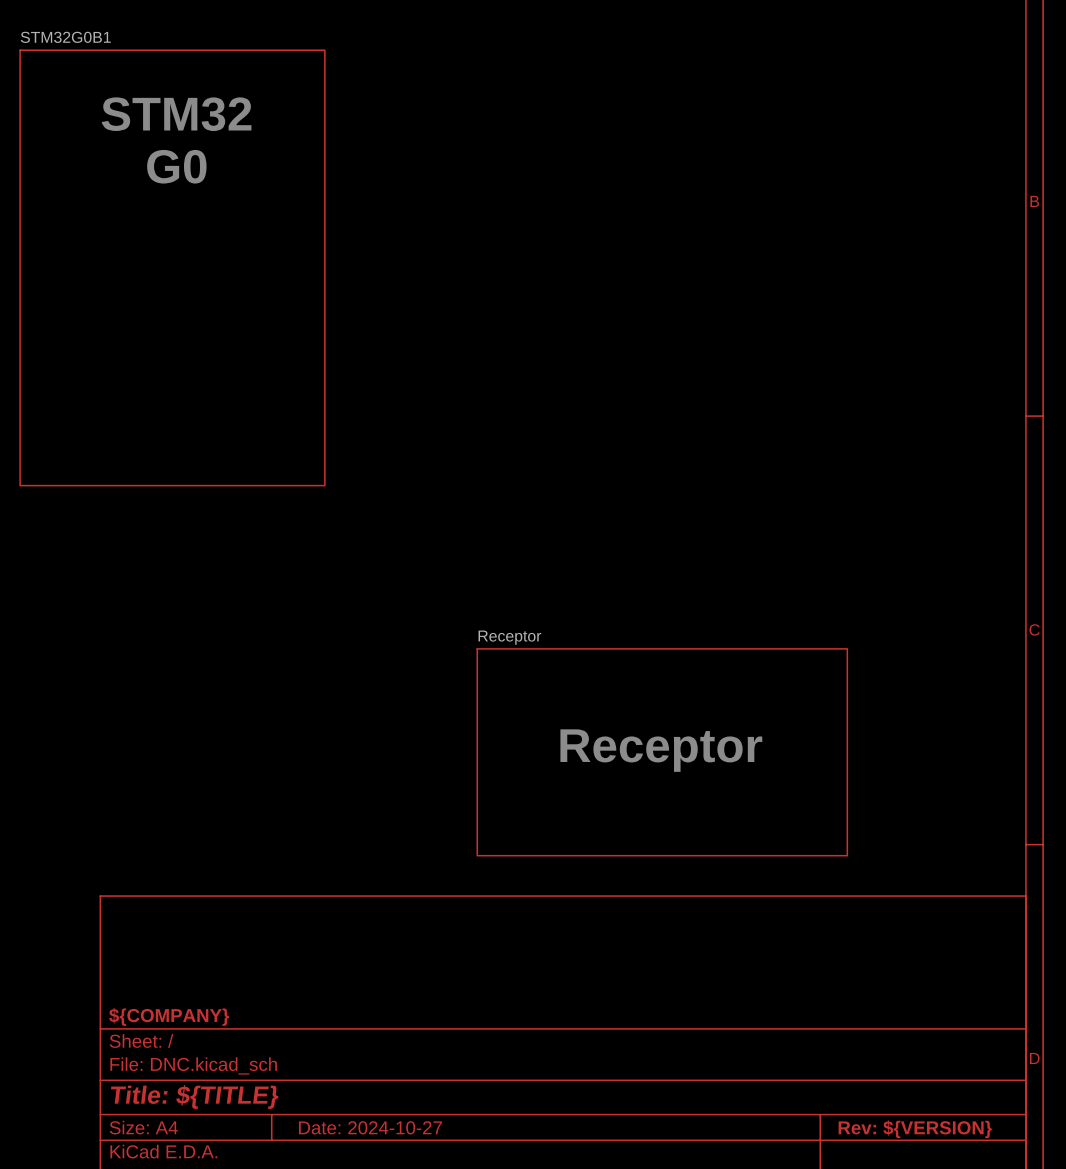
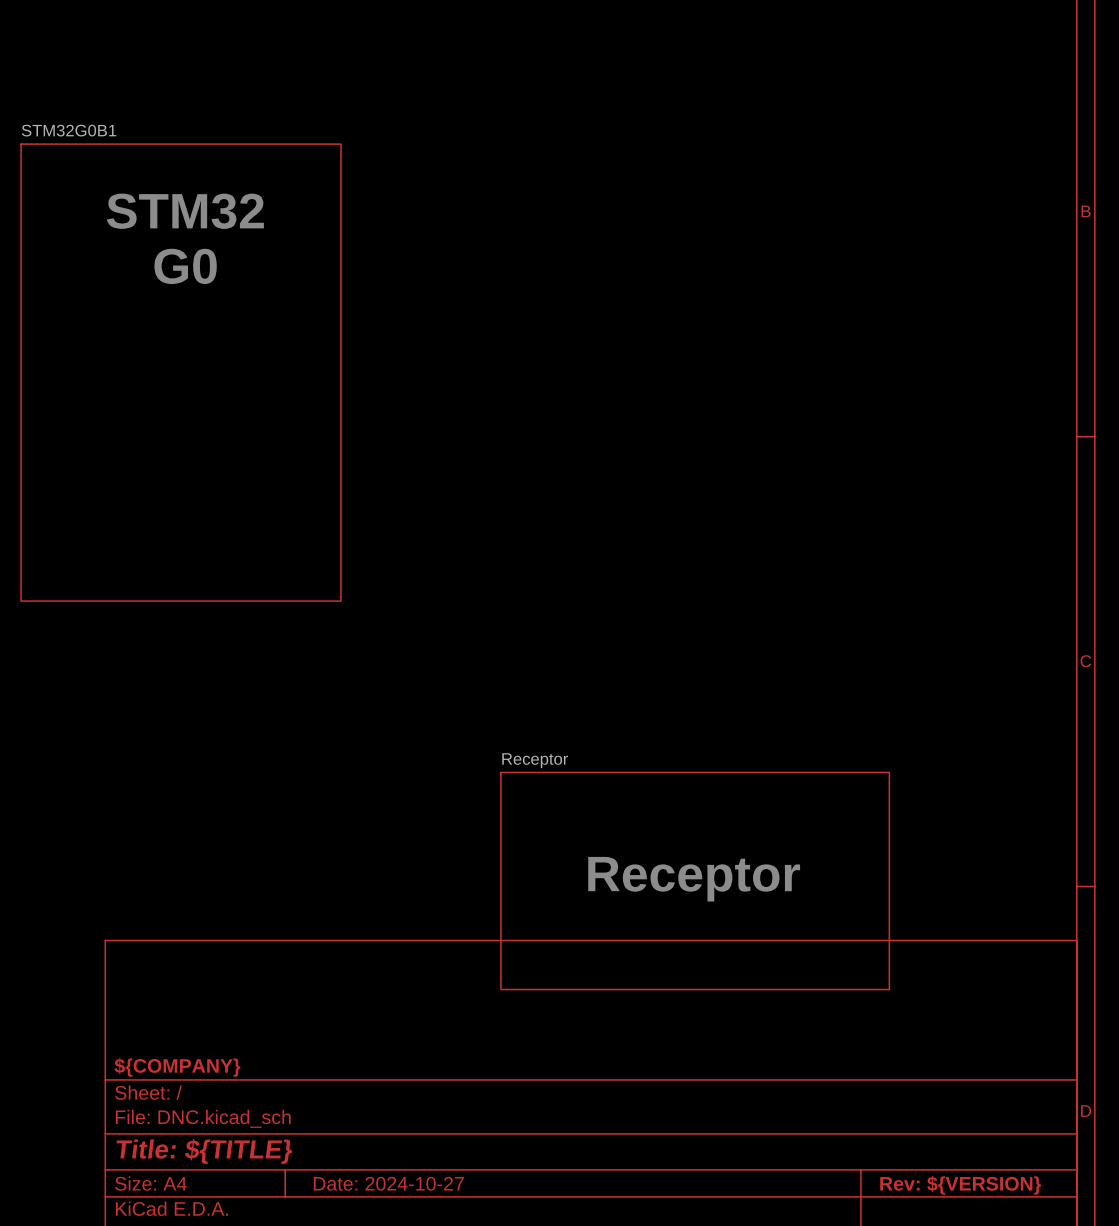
text position: STM32 (176, 114) -> STM32 (185, 211)
text position: G0 (176, 166) -> G0 (185, 266)
sheet STM32G0B1 position: (172, 267) -> (181, 372)
text position: Receptor (661, 750) -> Receptor (694, 879)
sheet Receptor position: (662, 752) -> (695, 881)

